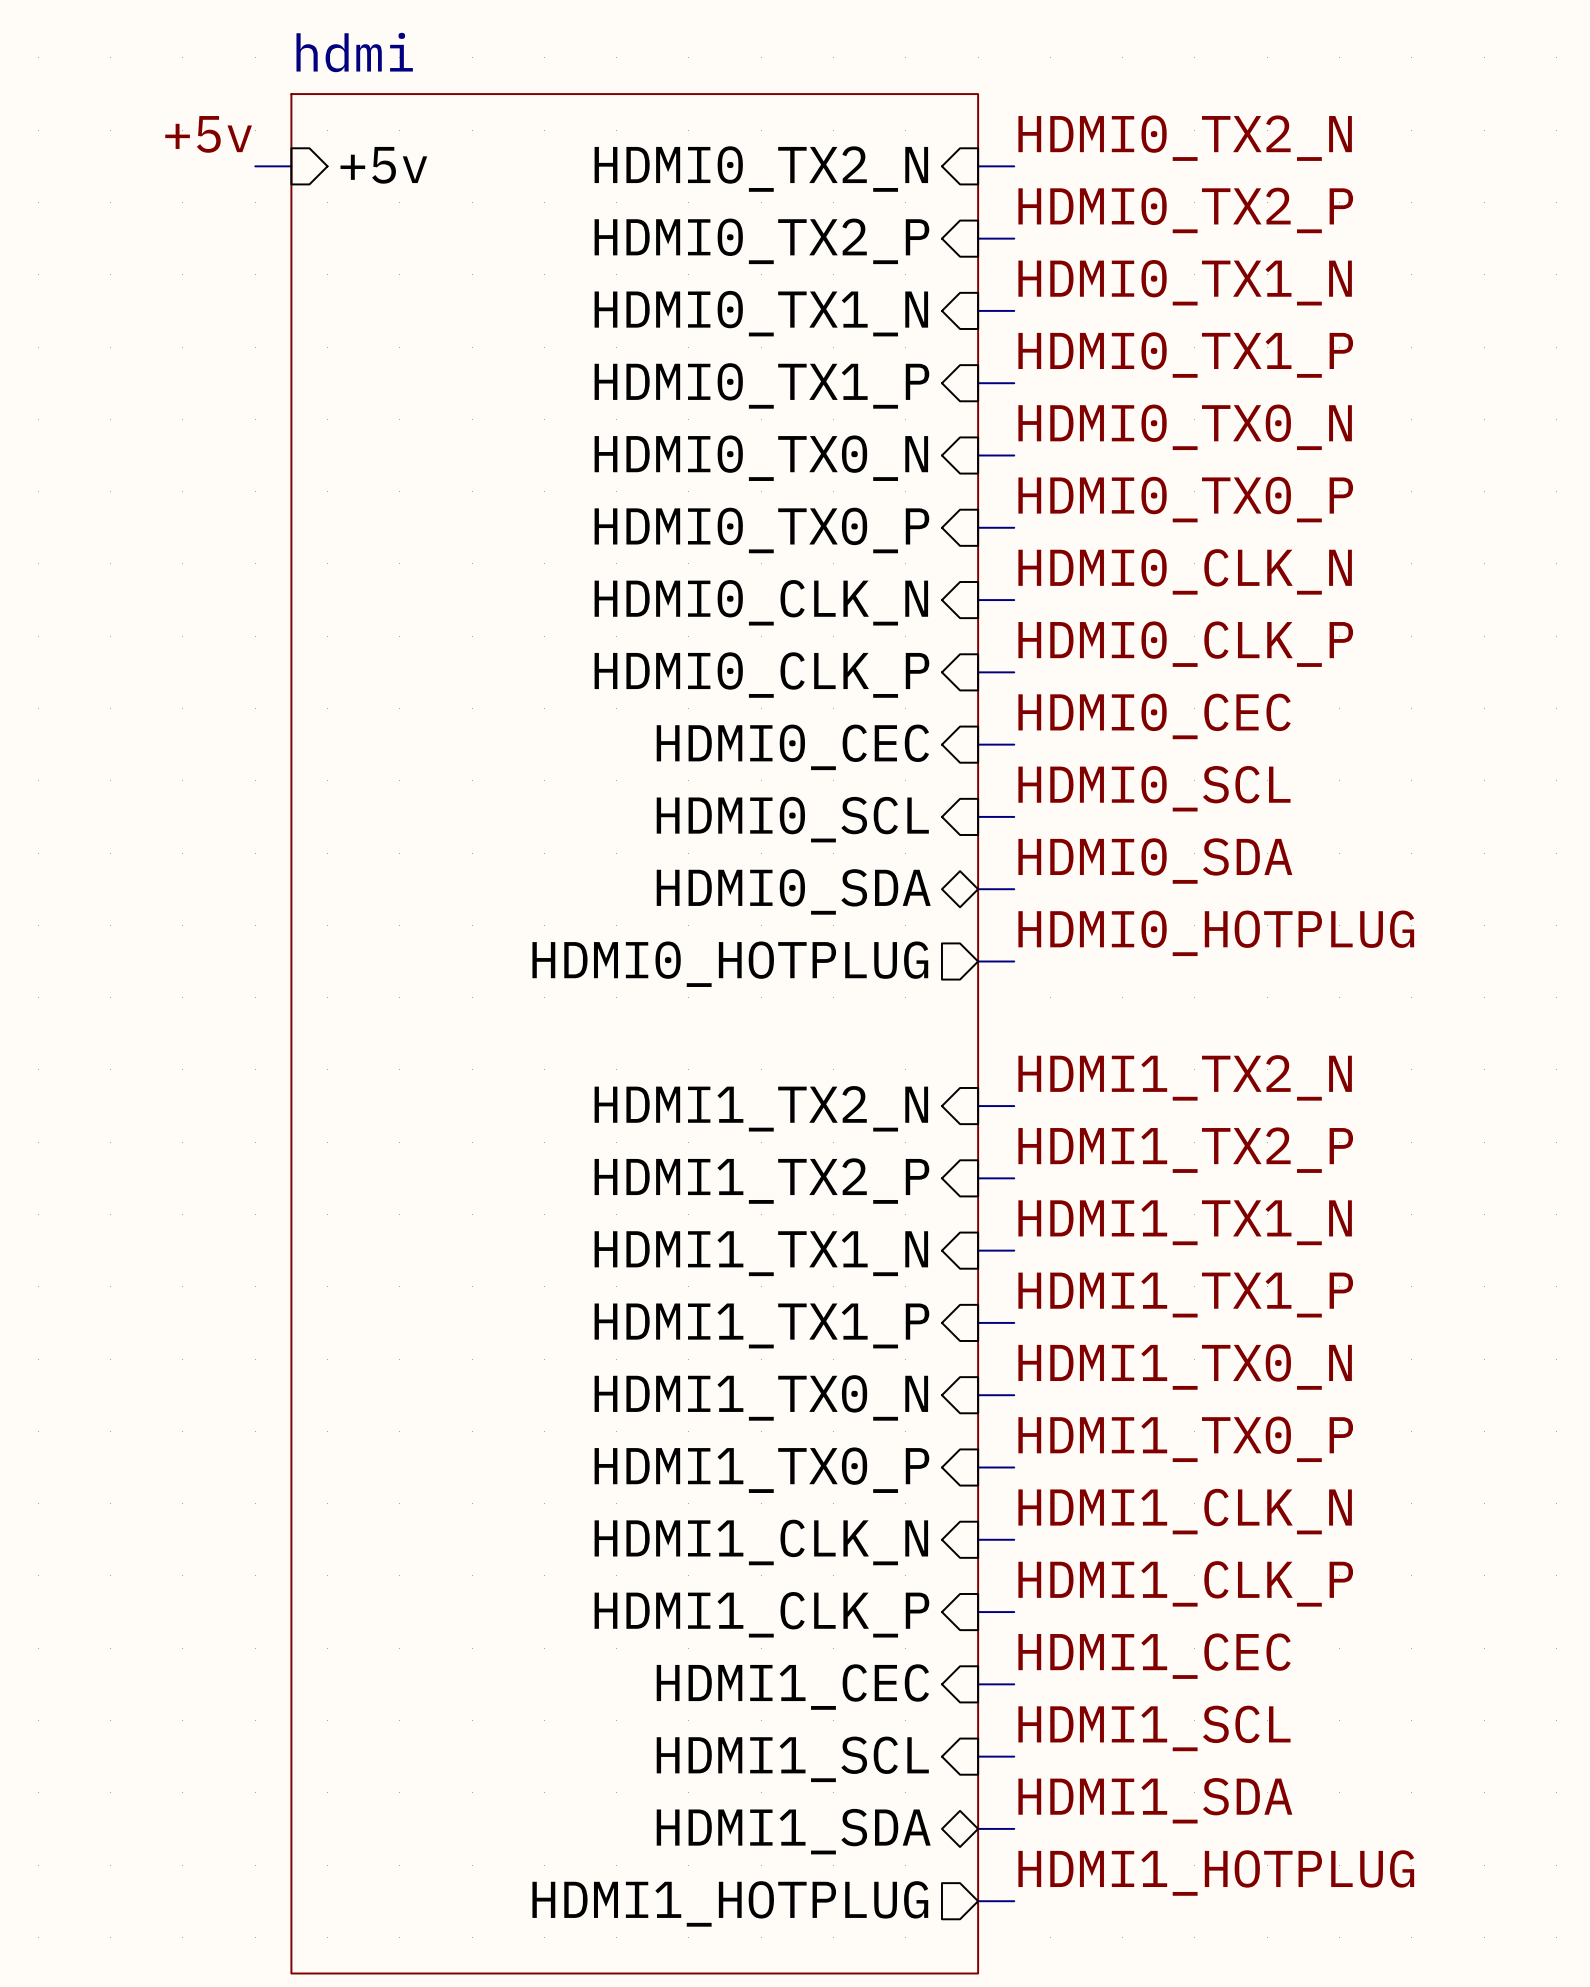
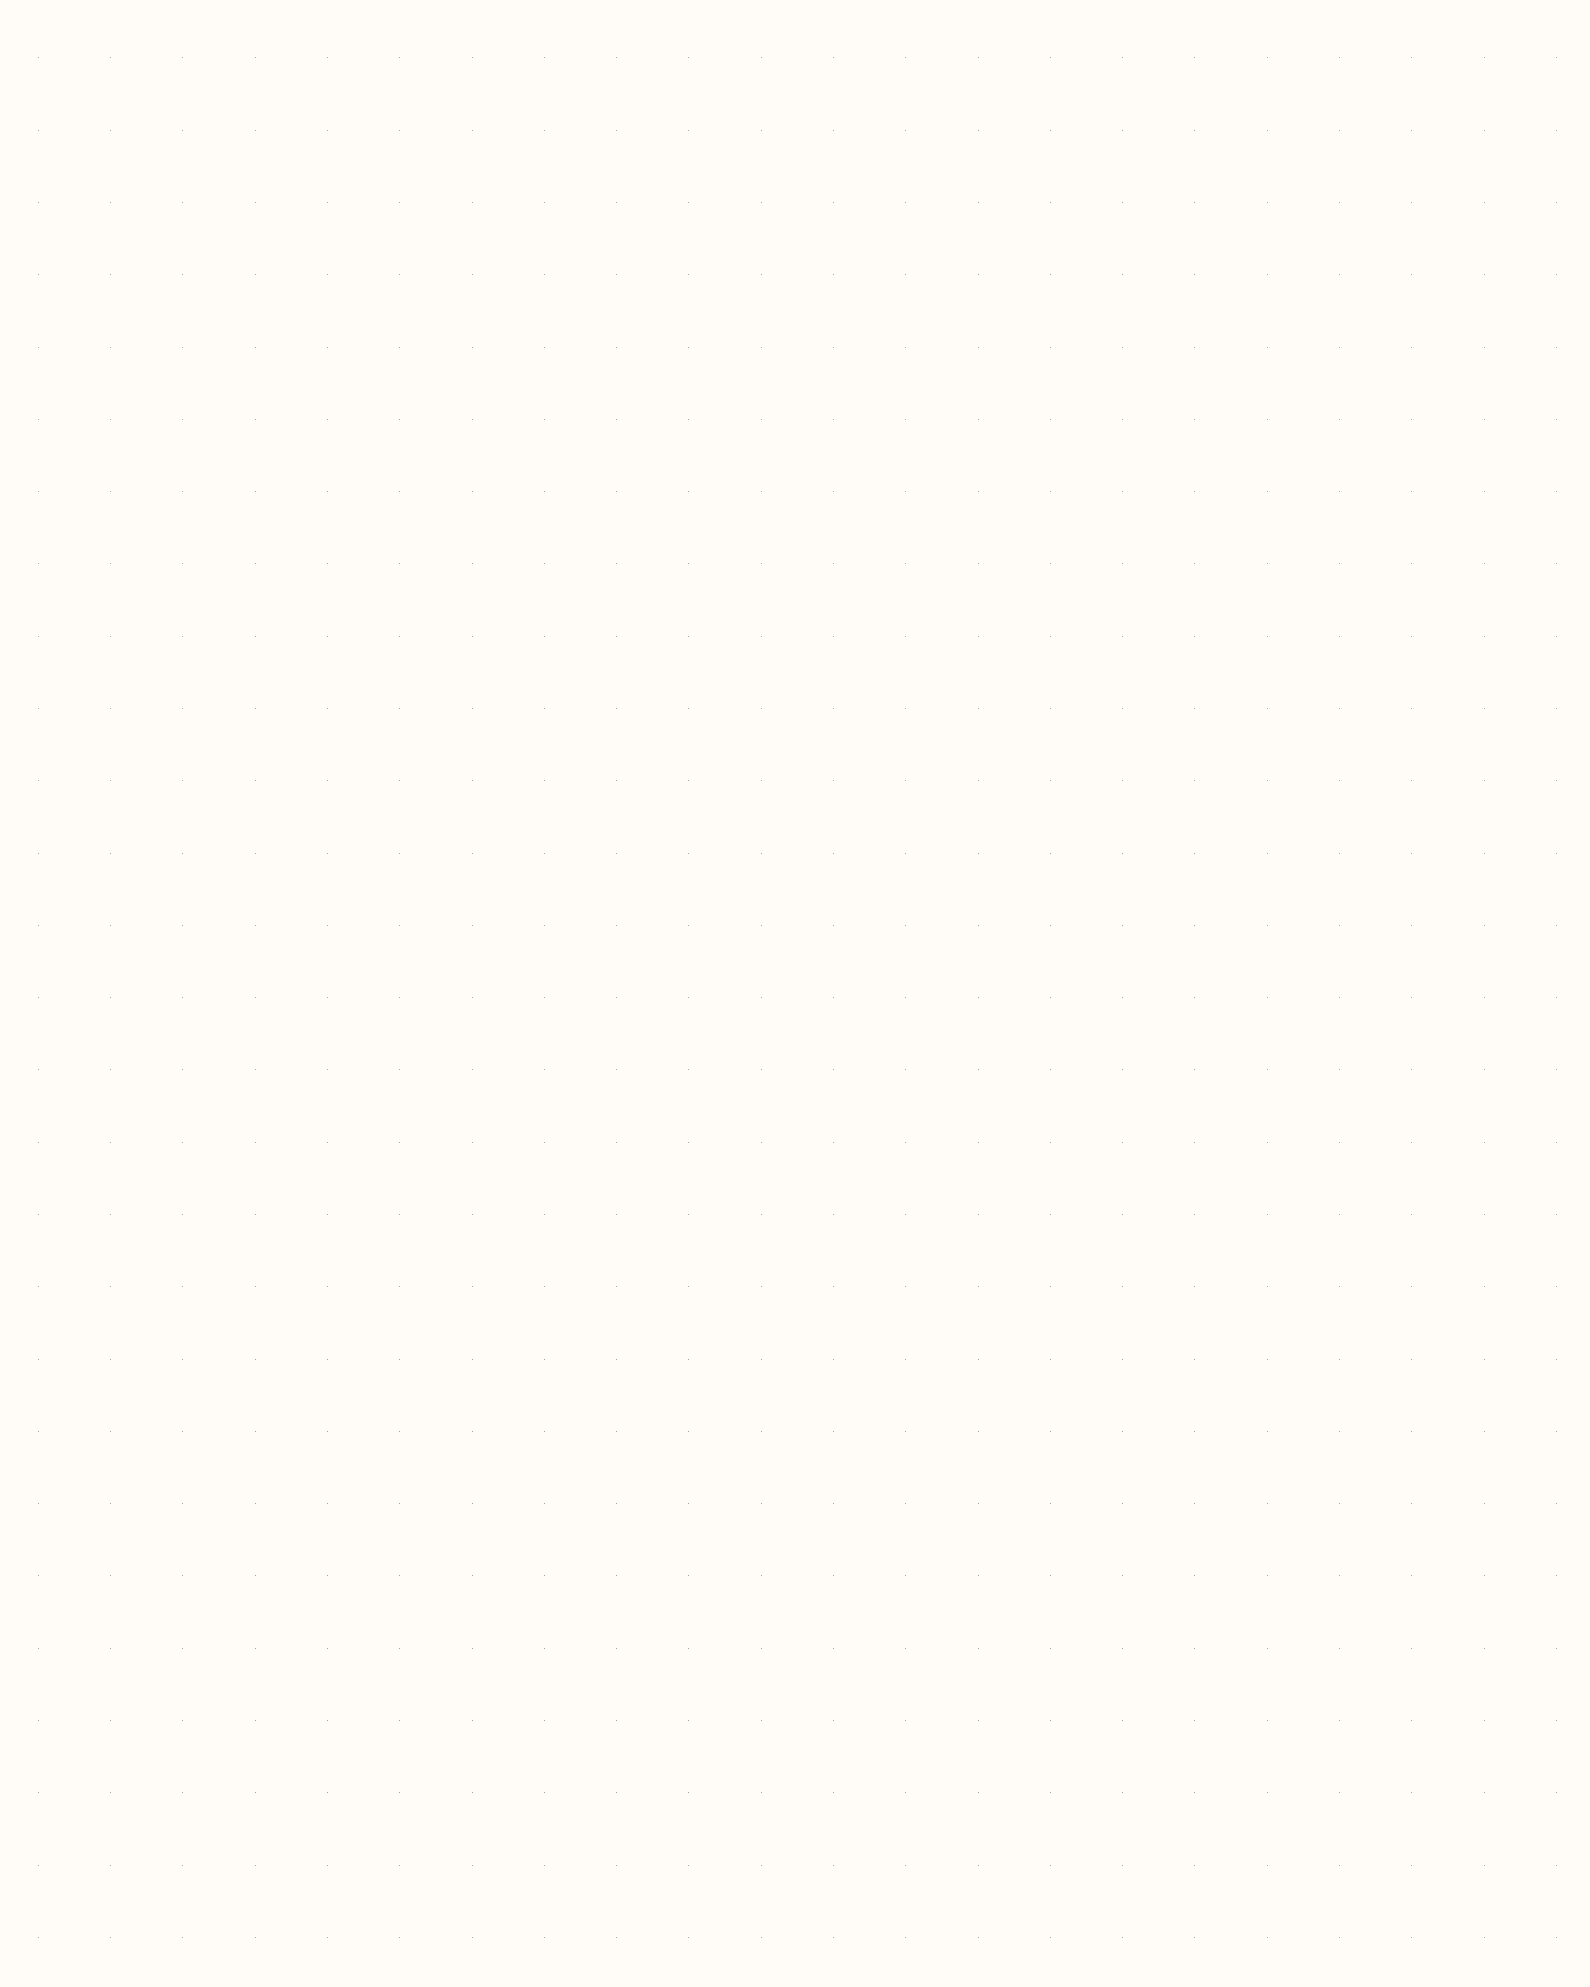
label: +5v (208, 134) -> none
label: HDMI0_TX2_N (1185, 138) -> none
sheet pin: +5v (383, 165) -> none
wire: (255, 166) (291, 166) -> none
wire: (978, 166) (1014, 166) -> none
sheet pin: HDMI0_TX2_N (761, 169) -> none
label: HDMI0_TX2_P (1185, 210) -> none
wire: (978, 238) (1014, 238) -> none
sheet pin: HDMI0_TX2_P (761, 241) -> none
label: HDMI0_TX1_N (1185, 282) -> none
wire: (978, 310) (1014, 310) -> none
sheet pin: HDMI0_TX1_N (761, 313) -> none
label: HDMI0_TX1_P (1185, 355) -> none
wire: (978, 383) (1014, 383) -> none
sheet pin: HDMI0_TX1_P (761, 385) -> none
label: HDMI0_TX0_N (1185, 427) -> none
wire: (978, 455) (1014, 455) -> none
sheet pin: HDMI0_TX0_N (761, 458) -> none
label: HDMI0_TX0_P (1185, 499) -> none
wire: (978, 527) (1014, 527) -> none
sheet pin: HDMI0_TX0_P (761, 530) -> none
label: HDMI0_CLK_N (1185, 571) -> none
wire: (978, 600) (1014, 600) -> none
sheet pin: HDMI0_CLK_N (761, 602) -> none
label: HDMI0_CLK_P (1185, 644) -> none
wire: (978, 672) (1014, 672) -> none
sheet pin: HDMI0_CLK_P (761, 675) -> none
label: HDMI0_CEC (1154, 716) -> none
wire: (978, 744) (1014, 744) -> none
sheet pin: HDMI0_CEC (792, 747) -> none
label: HDMI0_SCL (1154, 788) -> none
wire: (978, 816) (1014, 816) -> none
sheet pin: HDMI0_SCL (792, 819) -> none
label: HDMI0_SDA (1155, 861) -> none
wire: (978, 889) (1014, 889) -> none
sheet pin: HDMI0_SDA (793, 891) -> none
label: HDMI0_HOTPLUG (1216, 933) -> none
wire: (978, 961) (1014, 961) -> none
sheet pin: HDMI0_HOTPLUG (730, 964) -> none
sheet hdmi: (634, 1033) -> none
label: HDMI1_TX2_N (1185, 1077) -> none
wire: (978, 1106) (1014, 1106) -> none
sheet pin: HDMI1_TX2_N (761, 1108) -> none
label: HDMI1_TX2_P (1185, 1150) -> none
wire: (978, 1178) (1014, 1178) -> none
sheet pin: HDMI1_TX2_P (761, 1181) -> none
label: HDMI1_TX1_N (1185, 1222) -> none
wire: (978, 1250) (1014, 1250) -> none
sheet pin: HDMI1_TX1_N (761, 1253) -> none
label: HDMI1_TX1_P (1185, 1295) -> none
wire: (978, 1322) (1014, 1322) -> none
sheet pin: HDMI1_TX1_P (761, 1325) -> none
label: HDMI1_TX0_N (1185, 1367) -> none
wire: (978, 1395) (1014, 1395) -> none
sheet pin: HDMI1_TX0_N (761, 1397) -> none
label: HDMI1_TX0_P (1185, 1439) -> none
wire: (978, 1467) (1014, 1467) -> none
sheet pin: HDMI1_TX0_P (761, 1470) -> none
label: HDMI1_CLK_N (1185, 1511) -> none
wire: (978, 1539) (1014, 1539) -> none
sheet pin: HDMI1_CLK_N (761, 1542) -> none
label: HDMI1_CLK_P (1185, 1583) -> none
wire: (978, 1612) (1014, 1612) -> none
sheet pin: HDMI1_CLK_P (761, 1614) -> none
label: HDMI1_CEC (1154, 1656) -> none
wire: (978, 1684) (1014, 1684) -> none
sheet pin: HDMI1_CEC (792, 1687) -> none
label: HDMI1_SCL (1154, 1728) -> none
wire: (978, 1756) (1014, 1756) -> none
sheet pin: HDMI1_SCL (792, 1759) -> none
label: HDMI1_SDA (1155, 1800) -> none
wire: (978, 1828) (1014, 1828) -> none
sheet pin: HDMI1_SDA (793, 1831) -> none
label: HDMI1_HOTPLUG (1216, 1873) -> none
wire: (978, 1901) (1014, 1901) -> none
sheet pin: HDMI1_HOTPLUG (730, 1903) -> none

